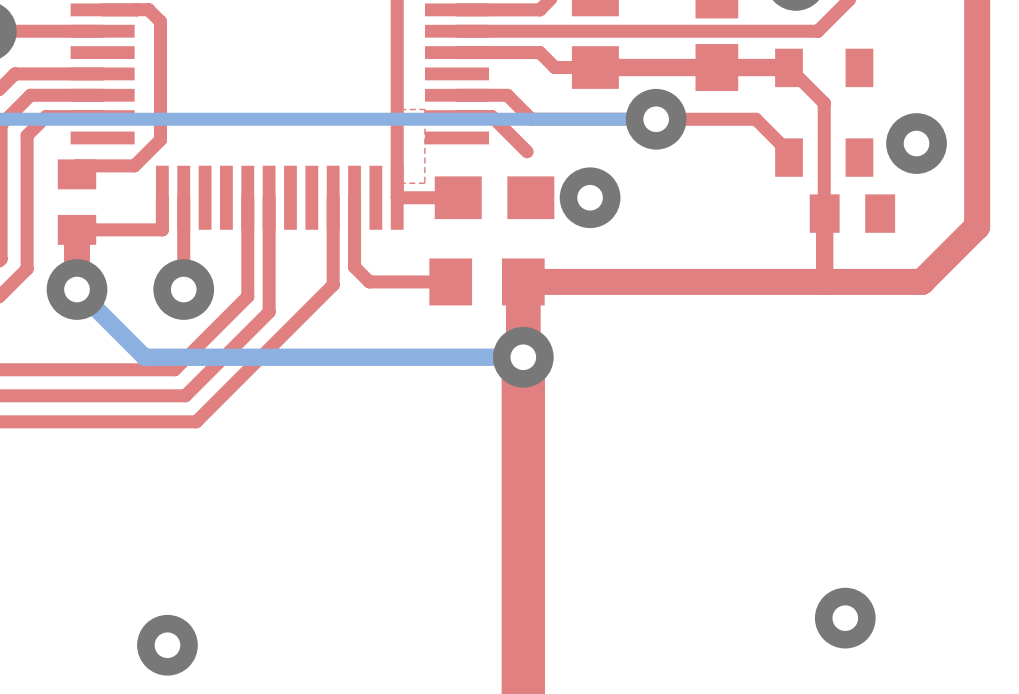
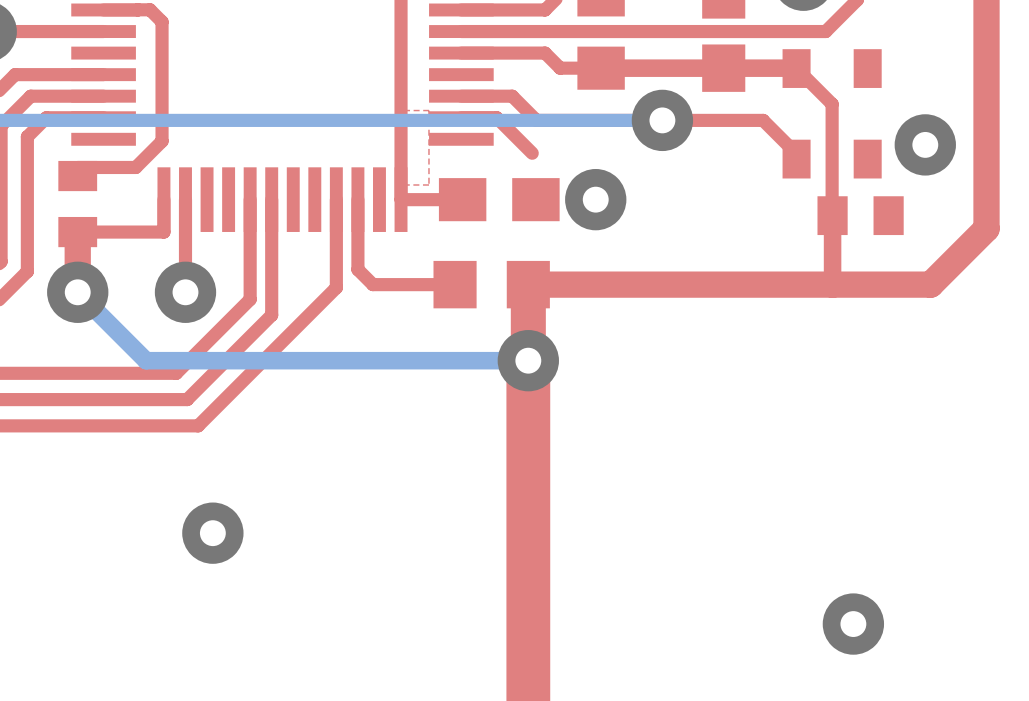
via position: (167, 645) -> (212, 533)

